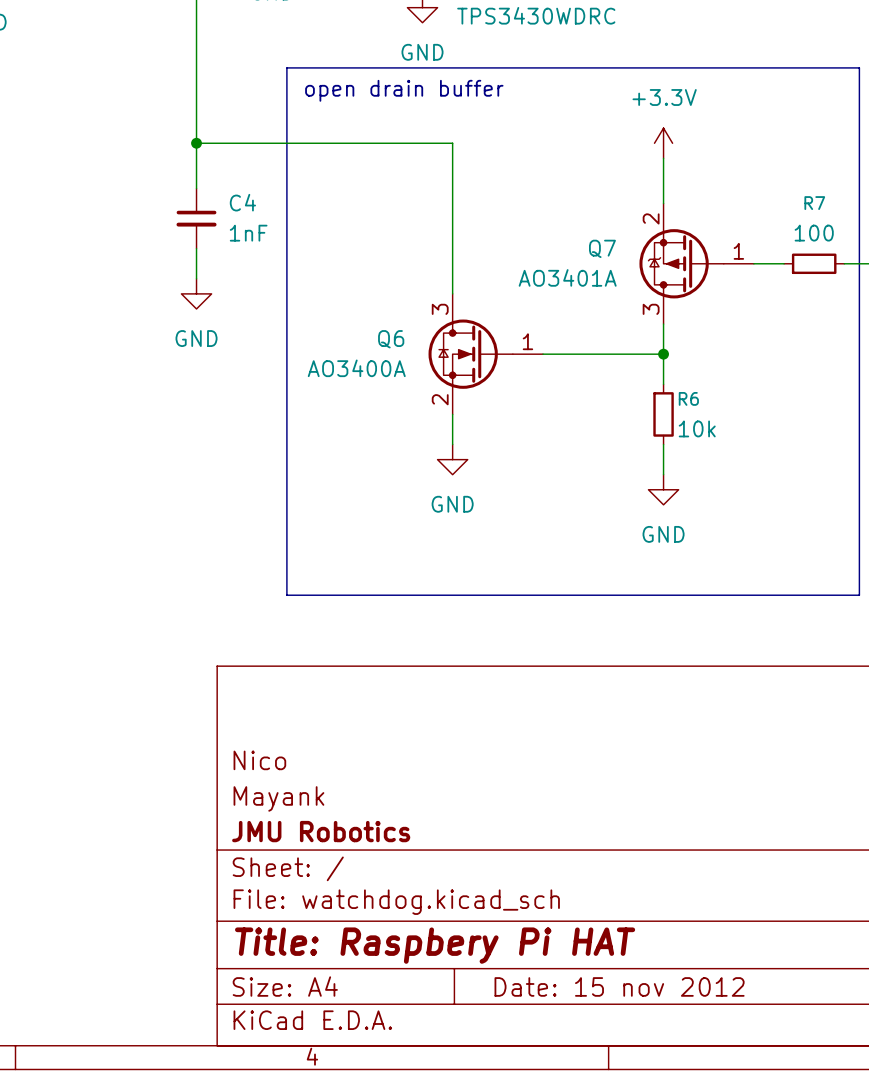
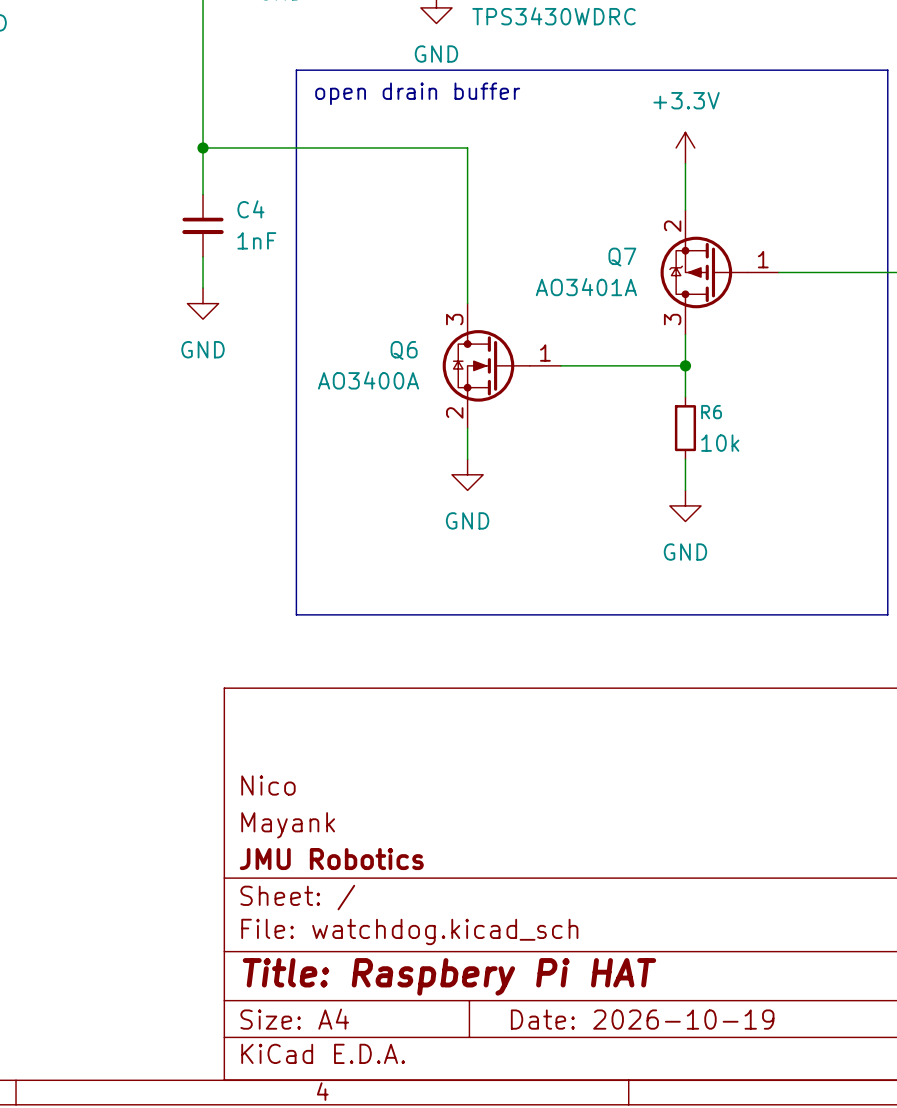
wire: none -> (809, 272) (872, 272)
R7: 100 (814, 263) -> none
title block: Date: 15 nov 2012 (619, 986) -> Date: 2026-10-19 (642, 1019)

